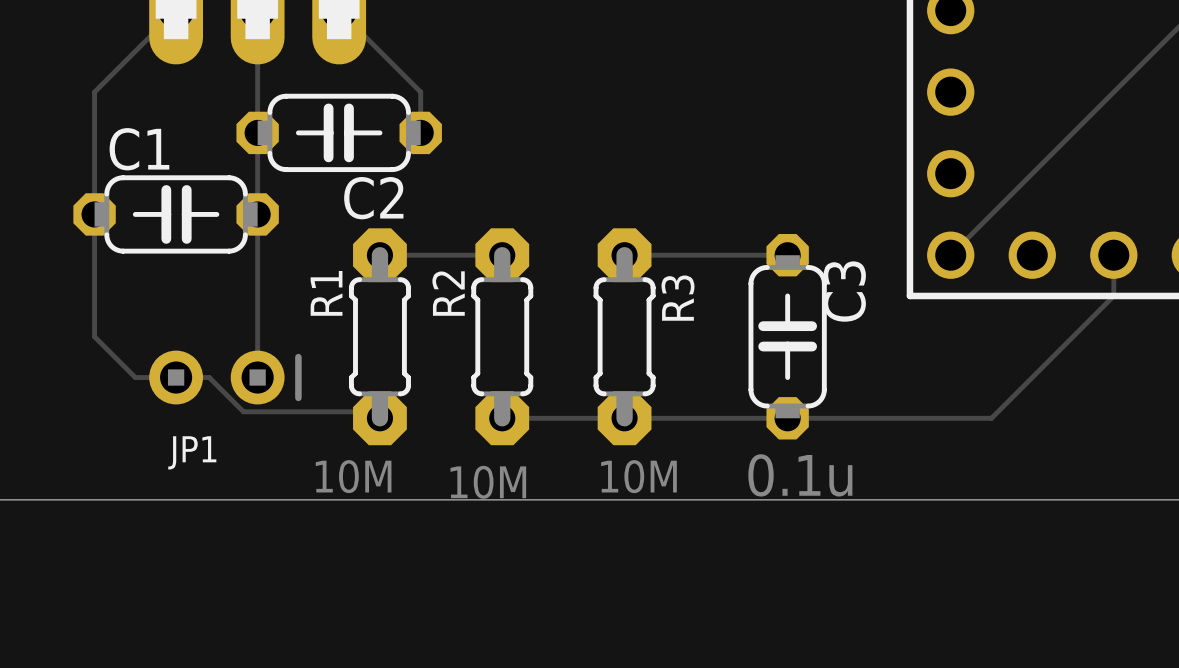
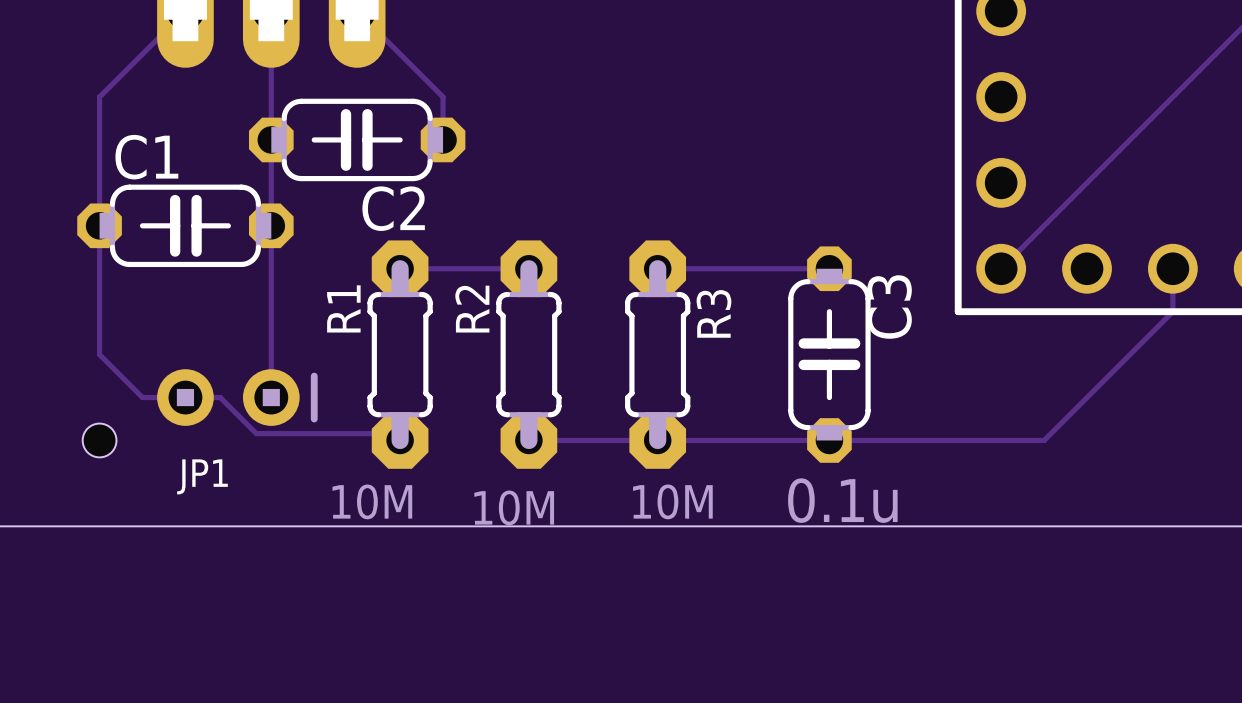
hole: none -> (99, 440)

